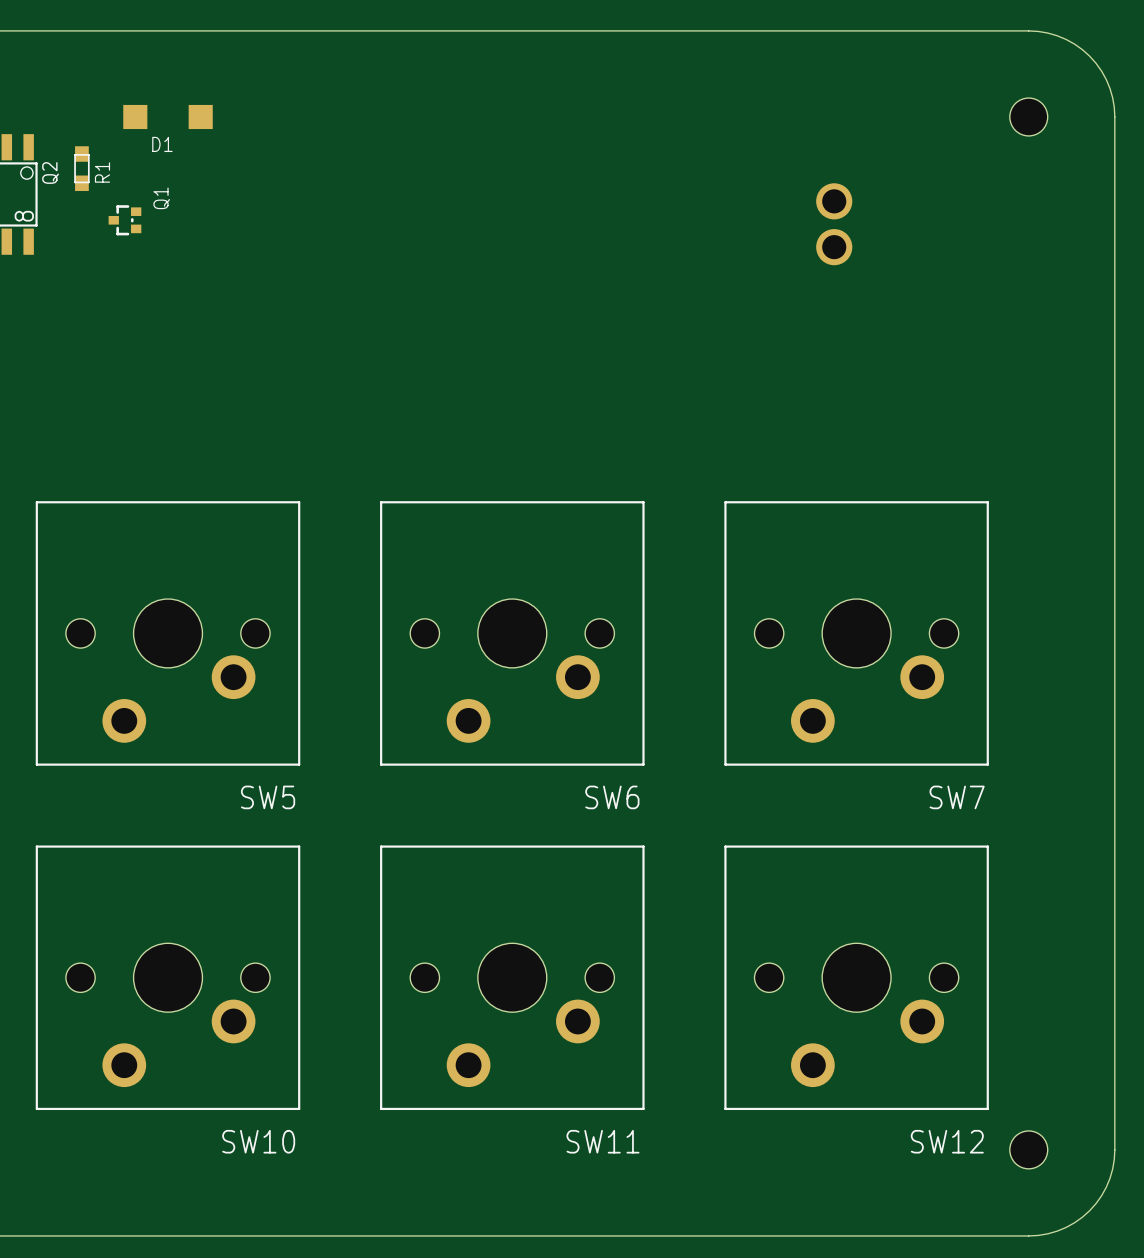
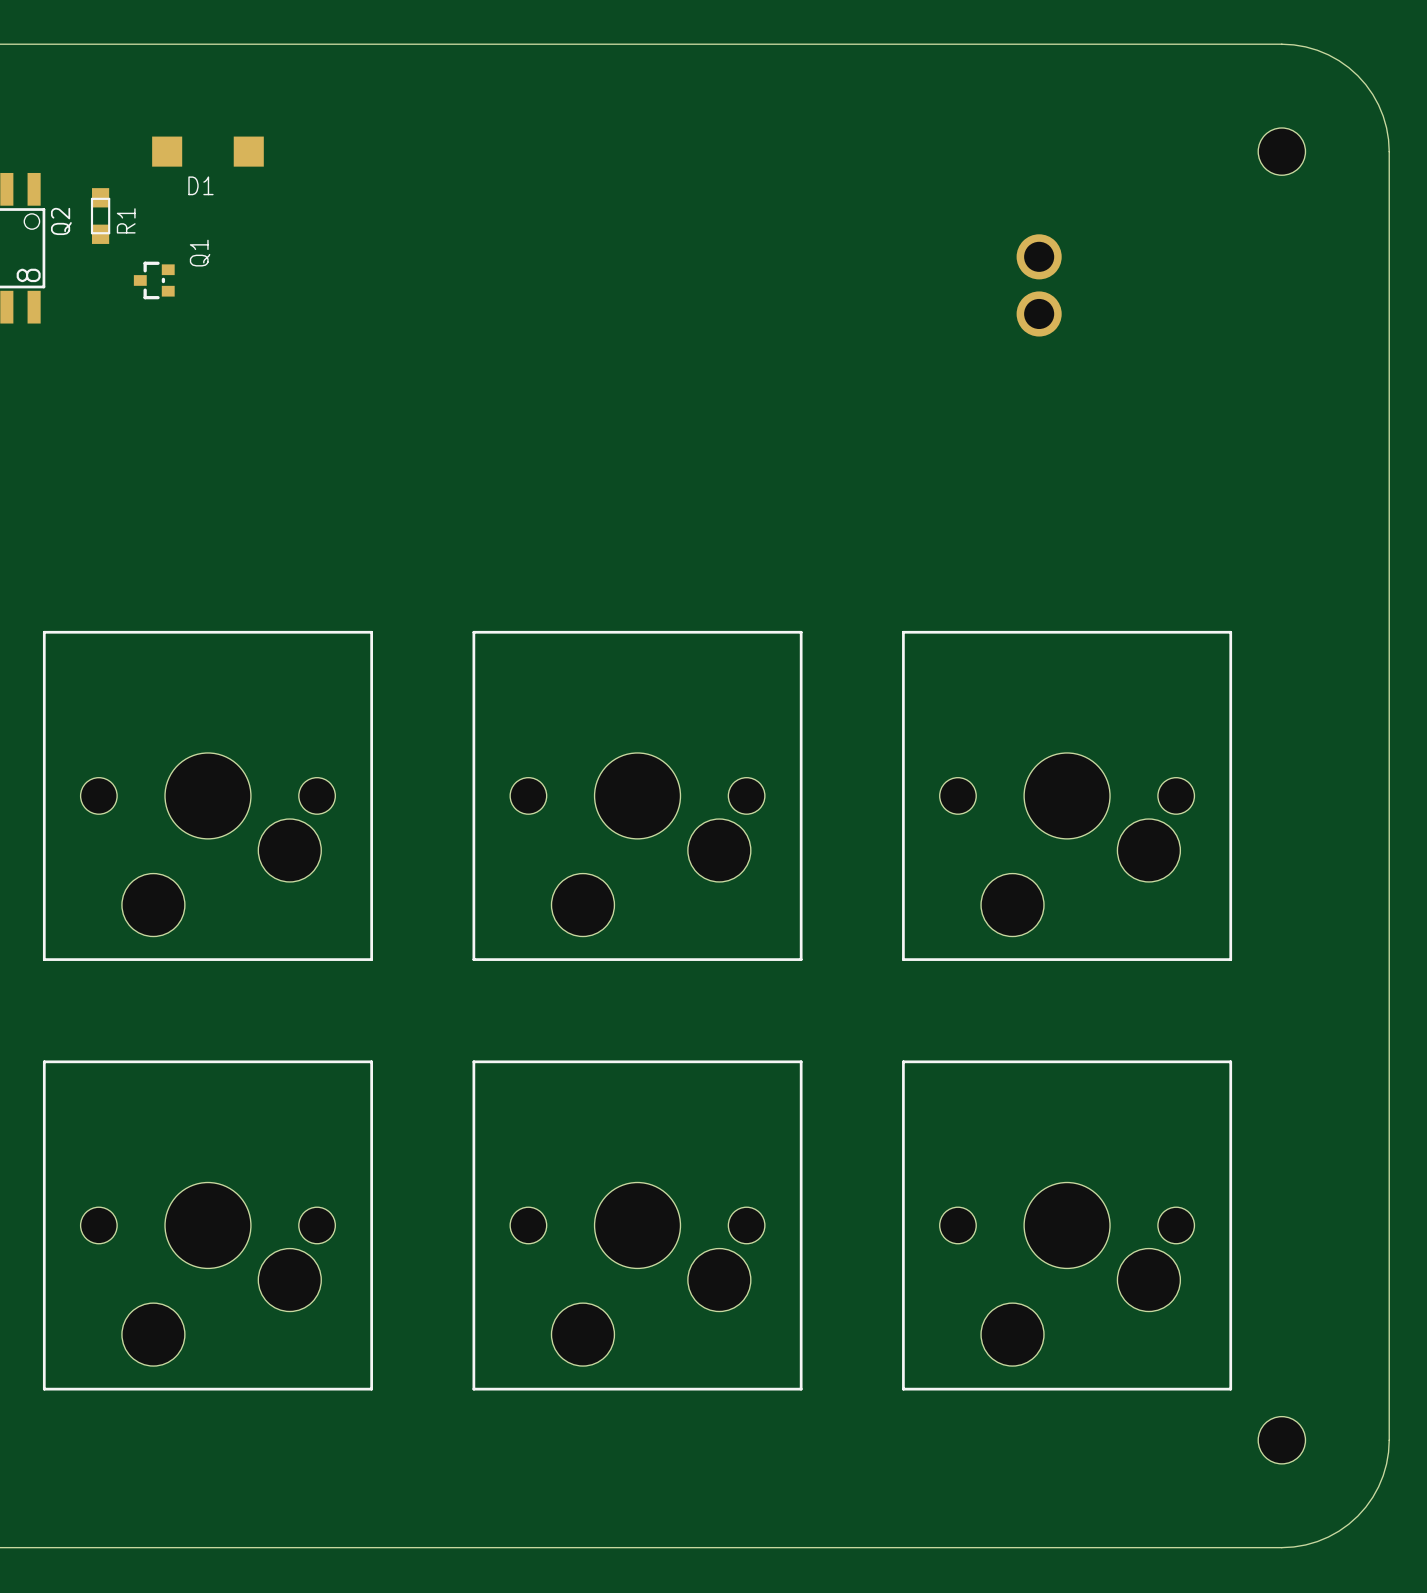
SW5: (168, 633) -> none
part: none -> (207, 795)
SW6: (512, 633) -> none
part: none -> (637, 795)
SW7: (856, 633) -> none
part: none -> (1067, 795)
SW10: (168, 977) -> none
part: none -> (207, 1225)
SW11: (512, 977) -> none
part: none -> (637, 1225)
SW12: (856, 977) -> none
part: none -> (1067, 1225)

